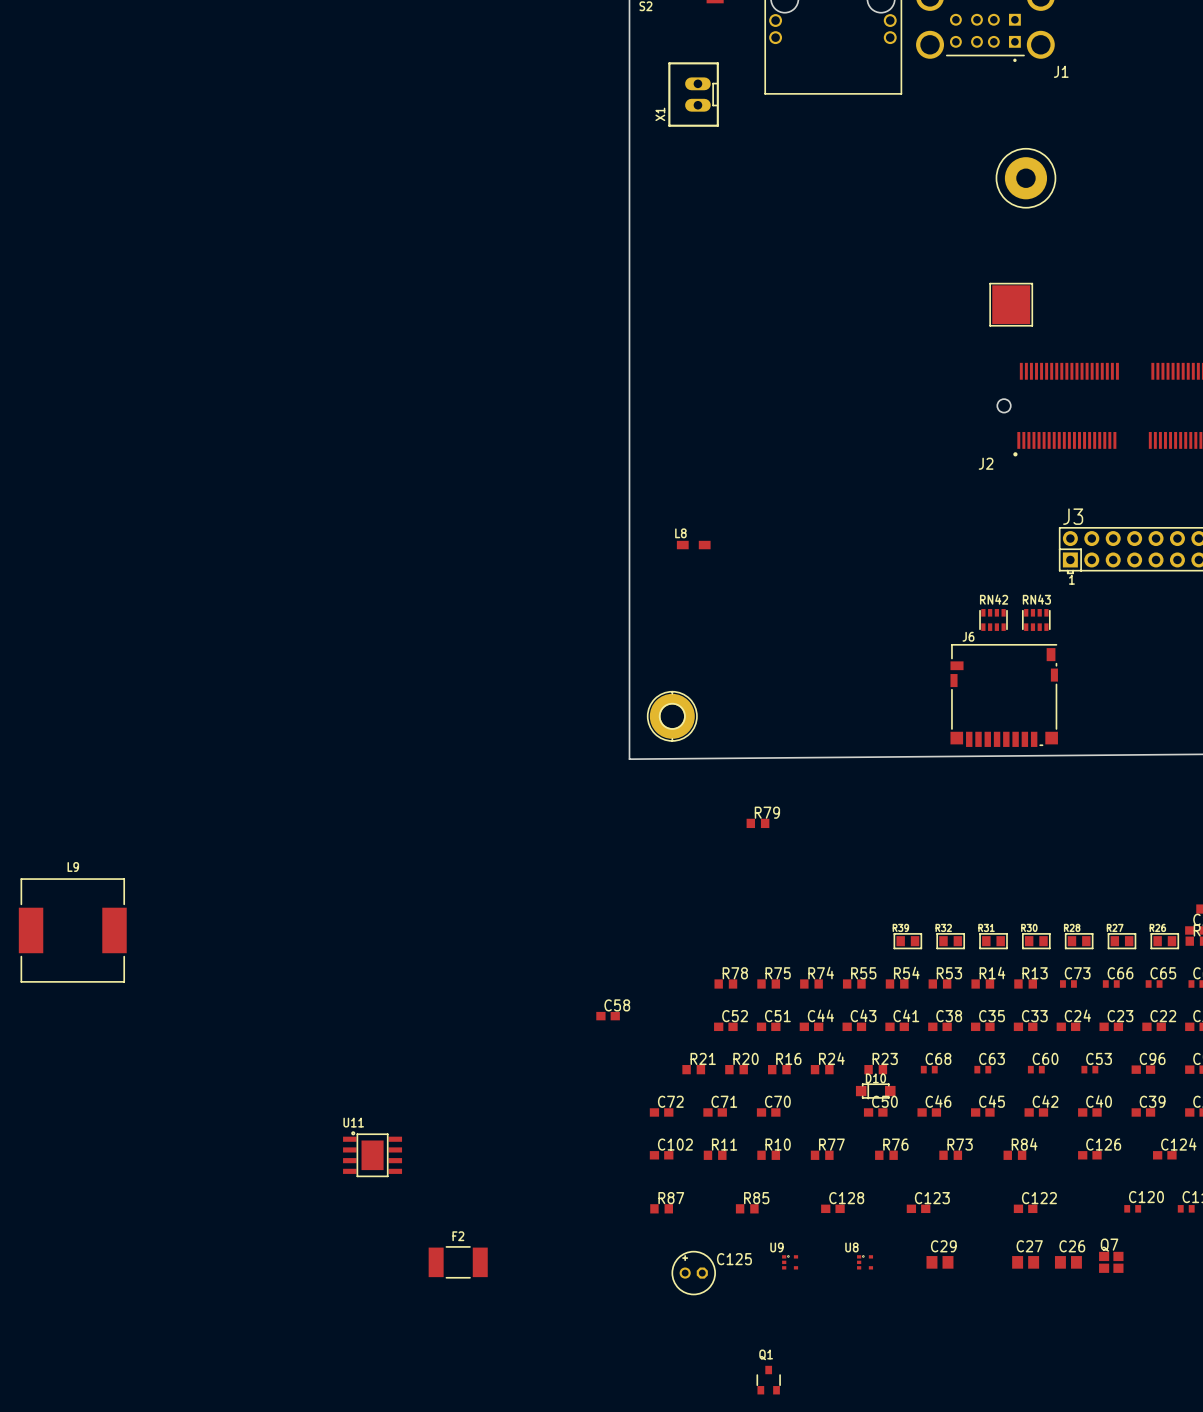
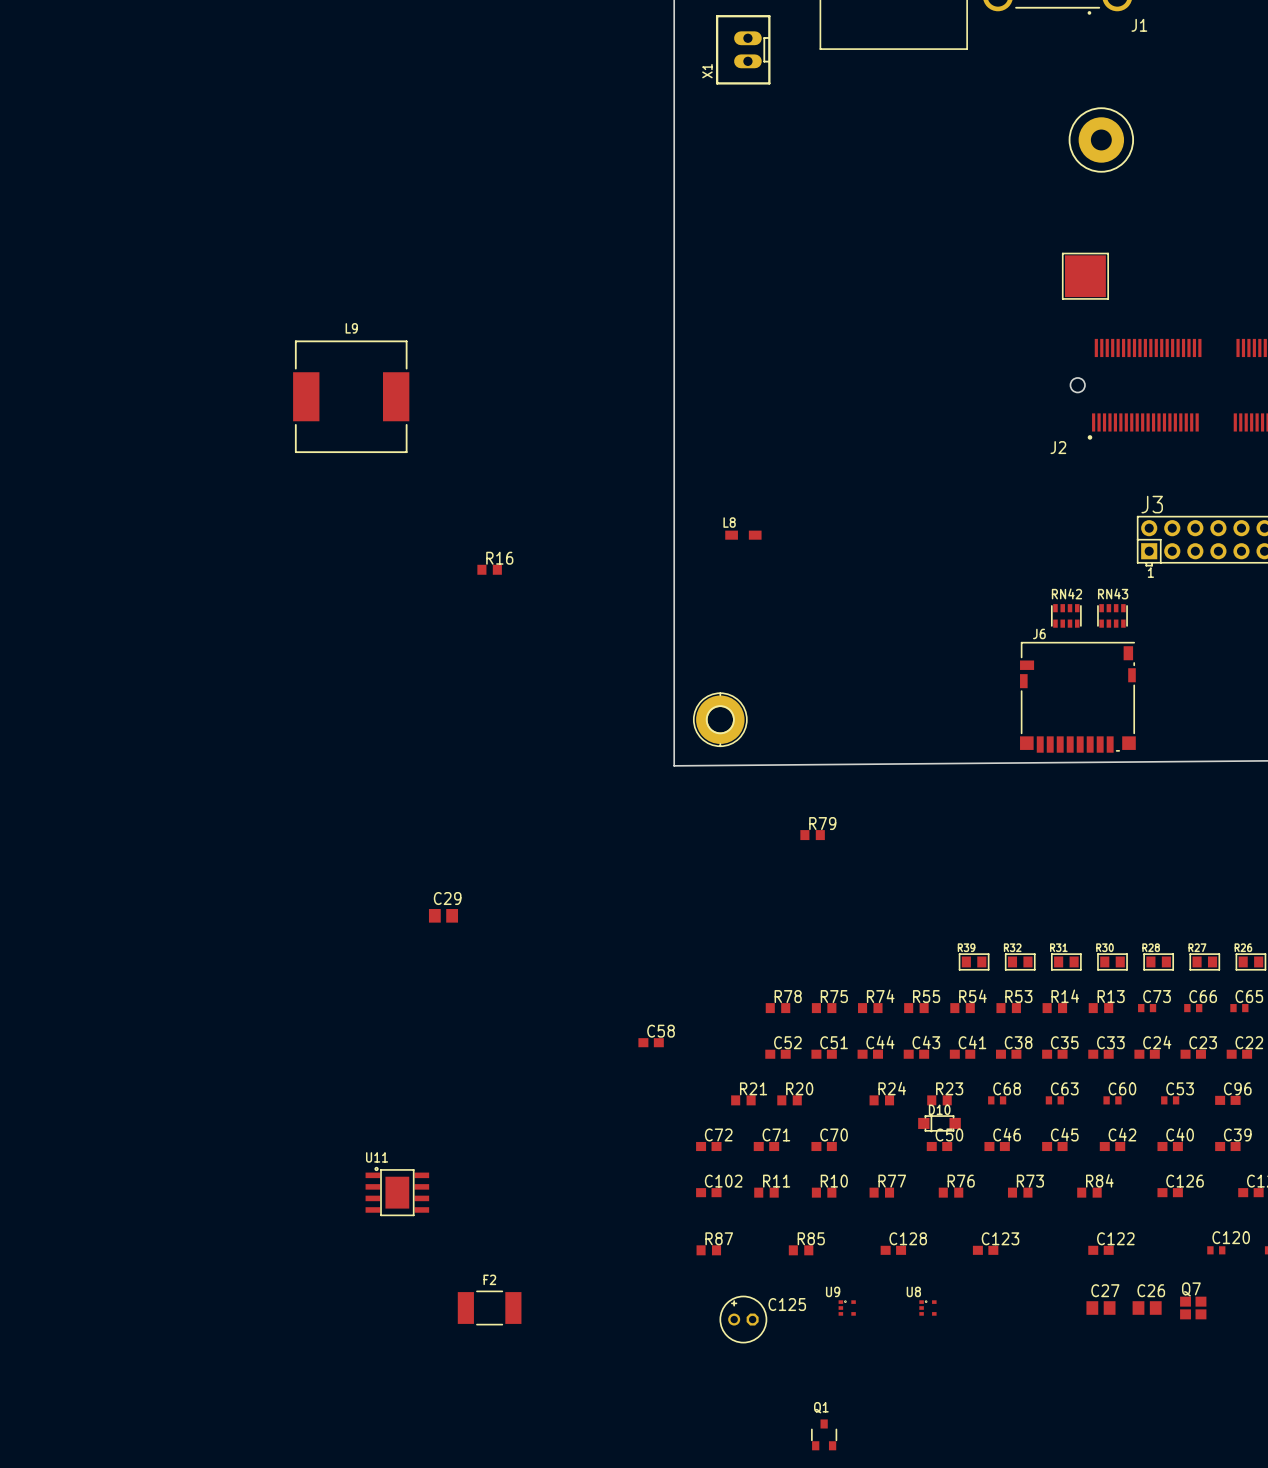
L9 position: (72, 930) -> (351, 396)
R16 position: (779, 1069) -> (489, 569)
C29 position: (939, 1262) -> (443, 915)

